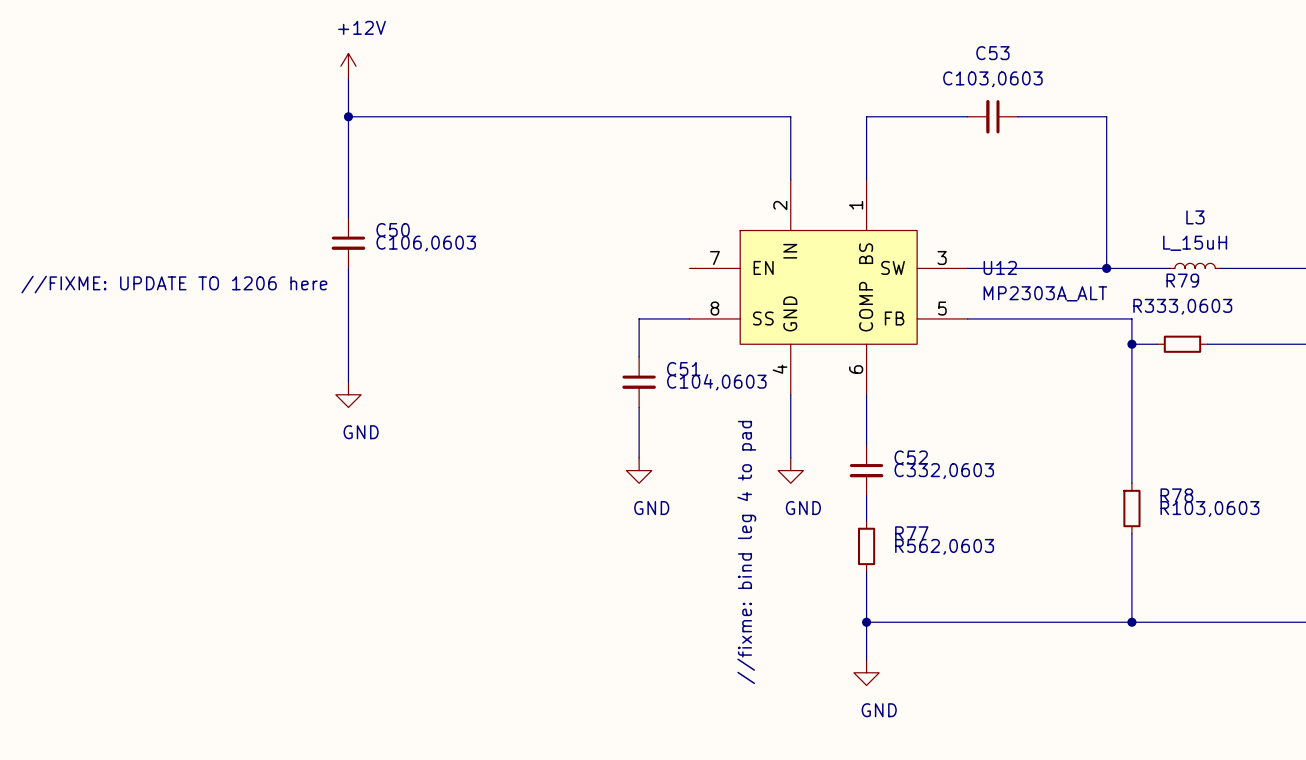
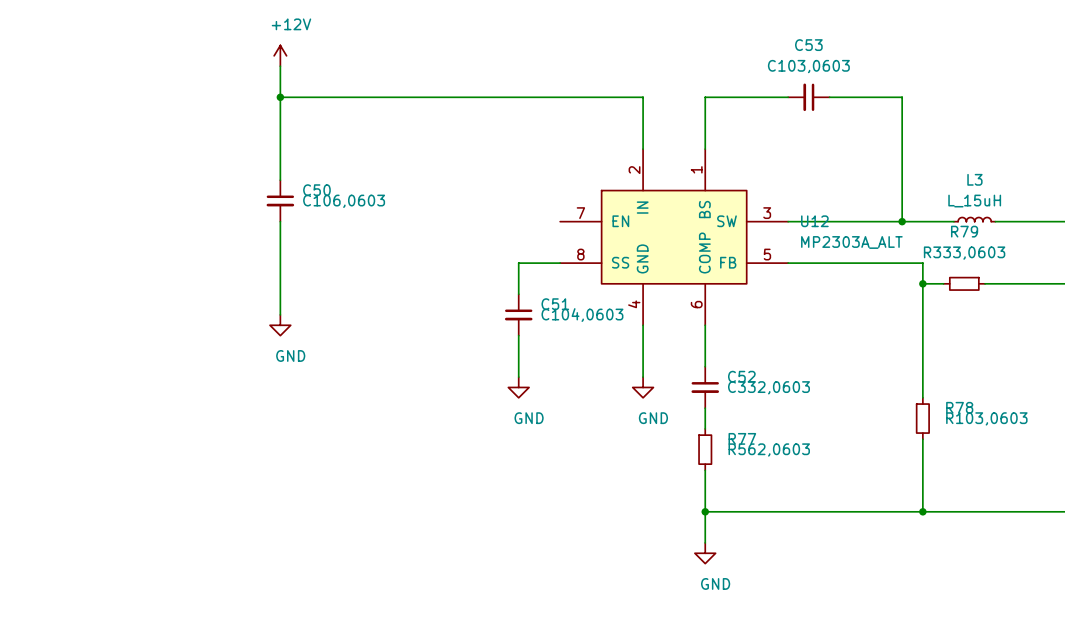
text: //FIXME: UPDATE TO 1206 here (174, 284) -> none
text: //fixme: bind leg 4 to pad (746, 552) -> none

